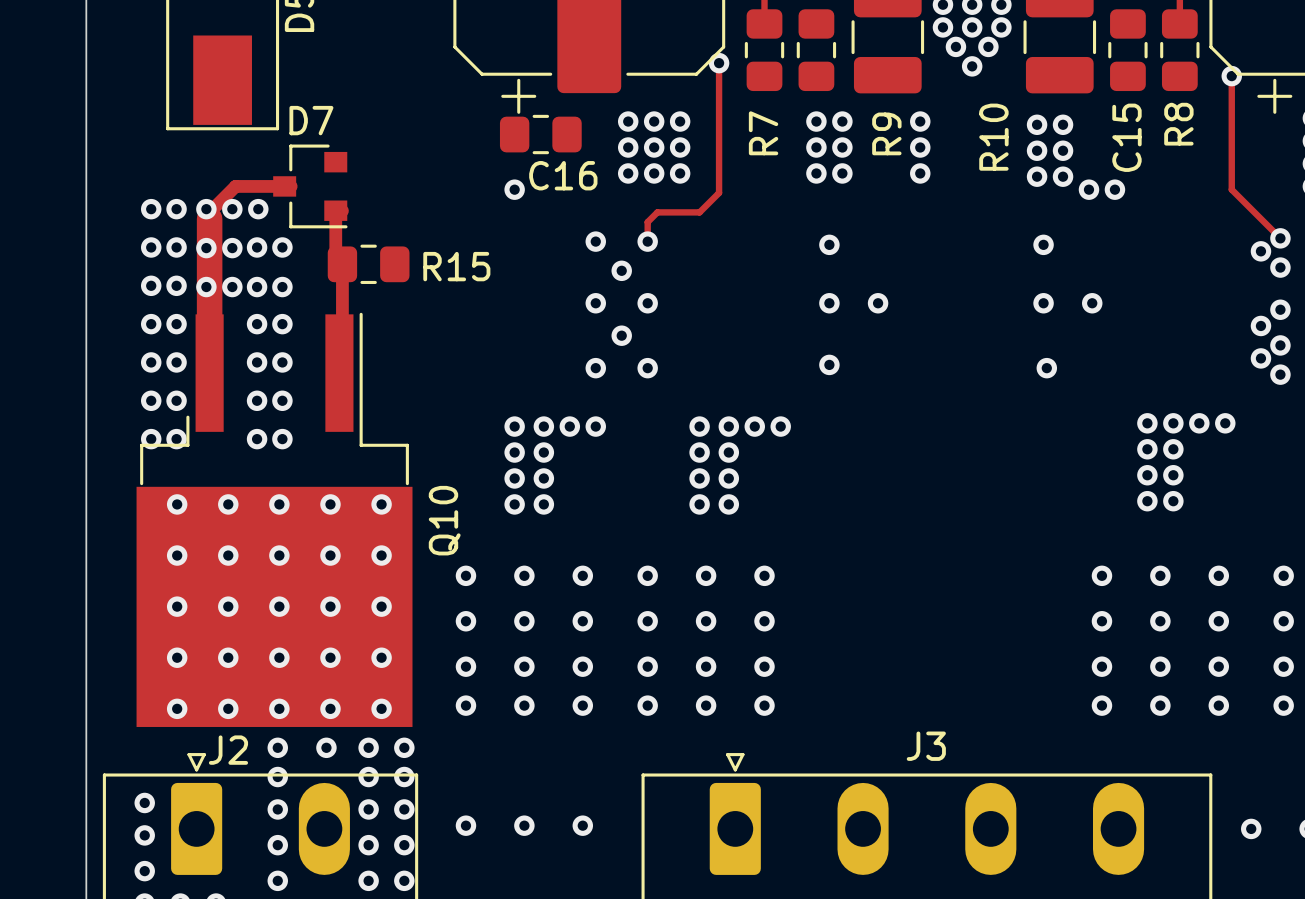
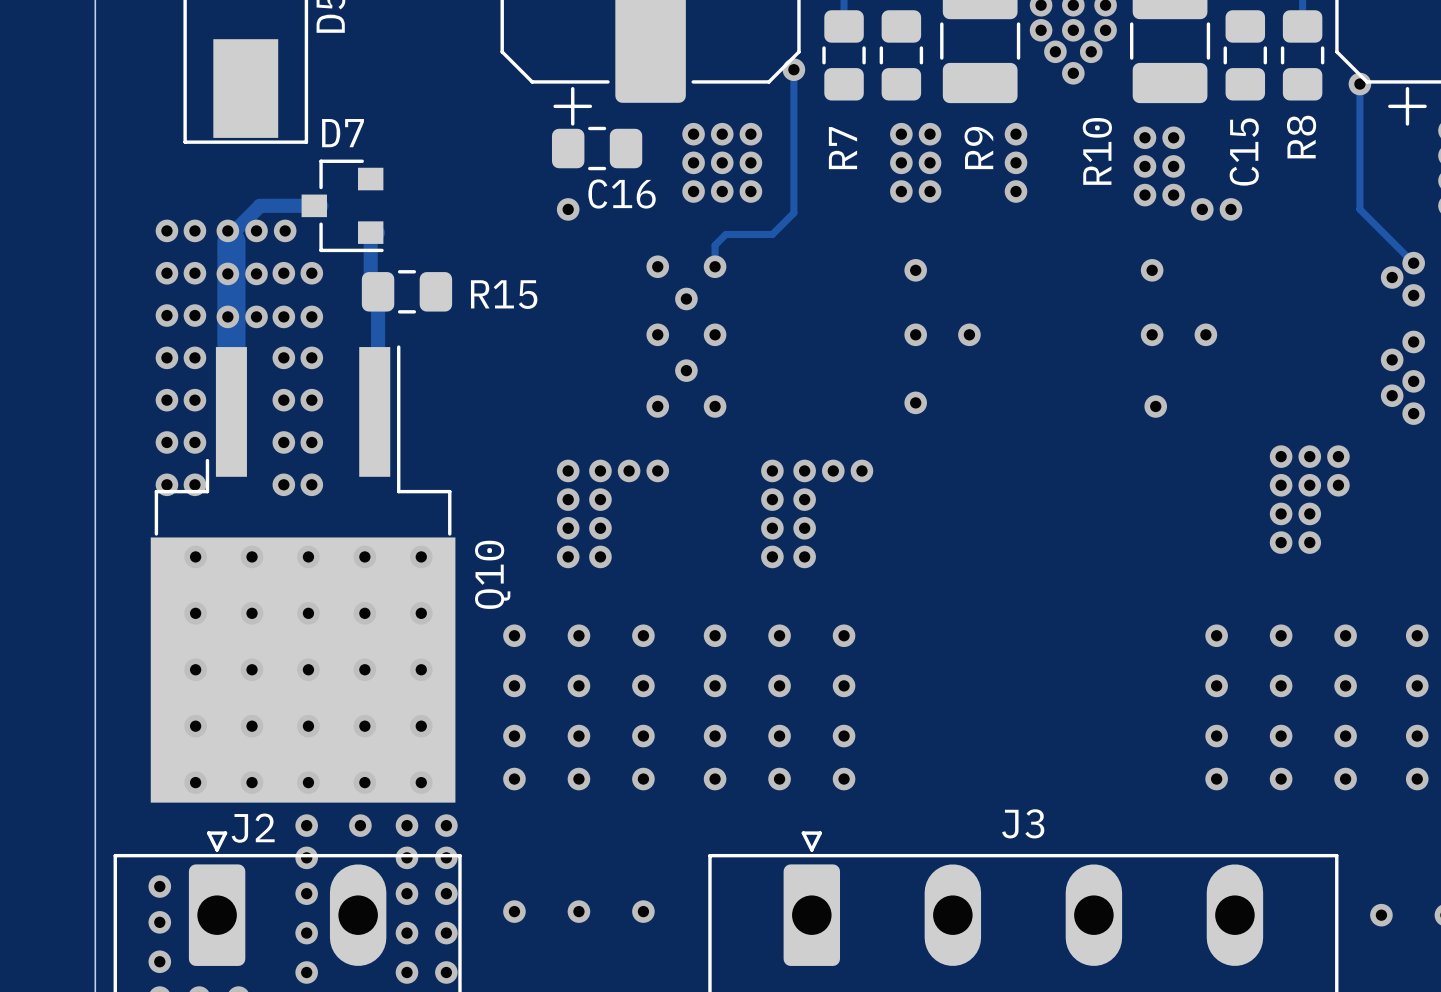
via: none -> (1281, 456)
via: none -> (1309, 456)
via: none -> (1338, 456)
via: (1147, 423) -> none
via: (1173, 423) -> none
via: (1199, 423) -> none
via: (1225, 423) -> none
via: none -> (1281, 485)
via: none -> (1309, 485)
via: none -> (1338, 485)
via: (1147, 449) -> none
via: (1173, 449) -> none
via: none -> (1281, 513)
via: none -> (1309, 513)
via: (1147, 475) -> none
via: (1173, 475) -> none
via: none -> (1281, 542)
via: none -> (1309, 542)
via: (1147, 501) -> none
via: (1173, 501) -> none

